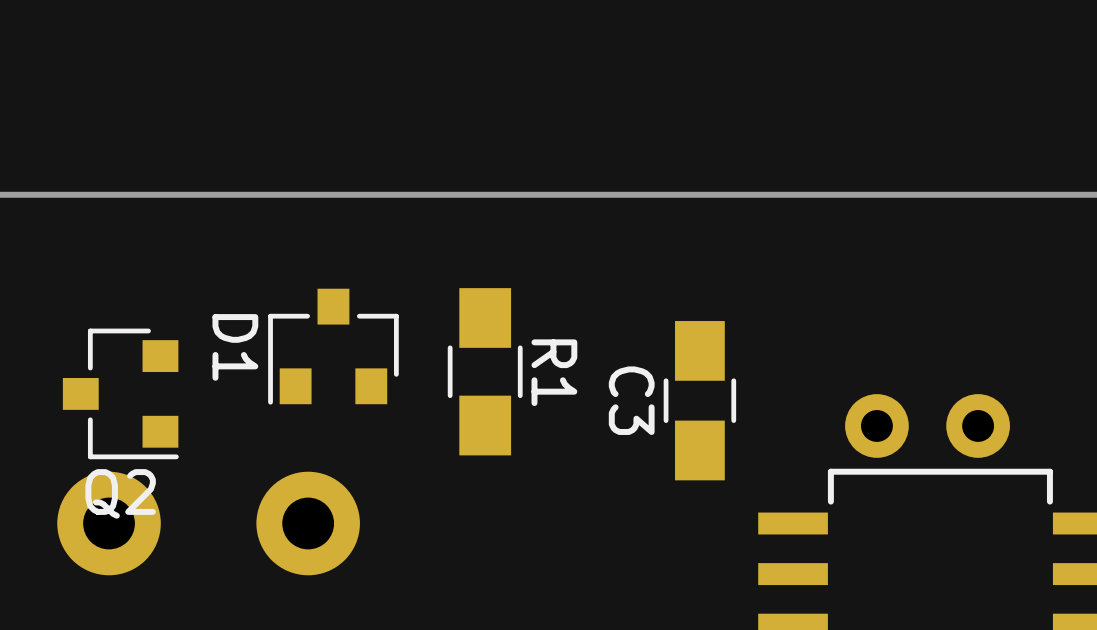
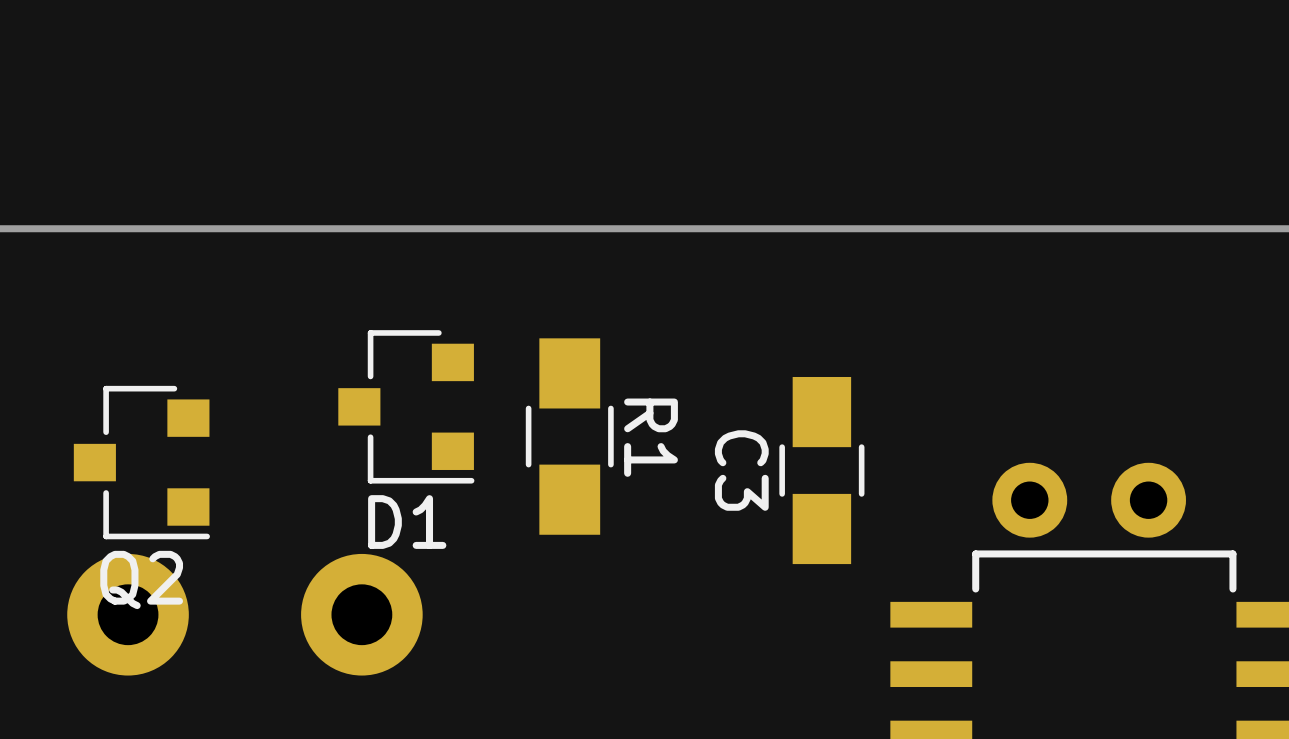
D1 rotation: 0° (333, 346) -> 90° counterclockwise (406, 406)

